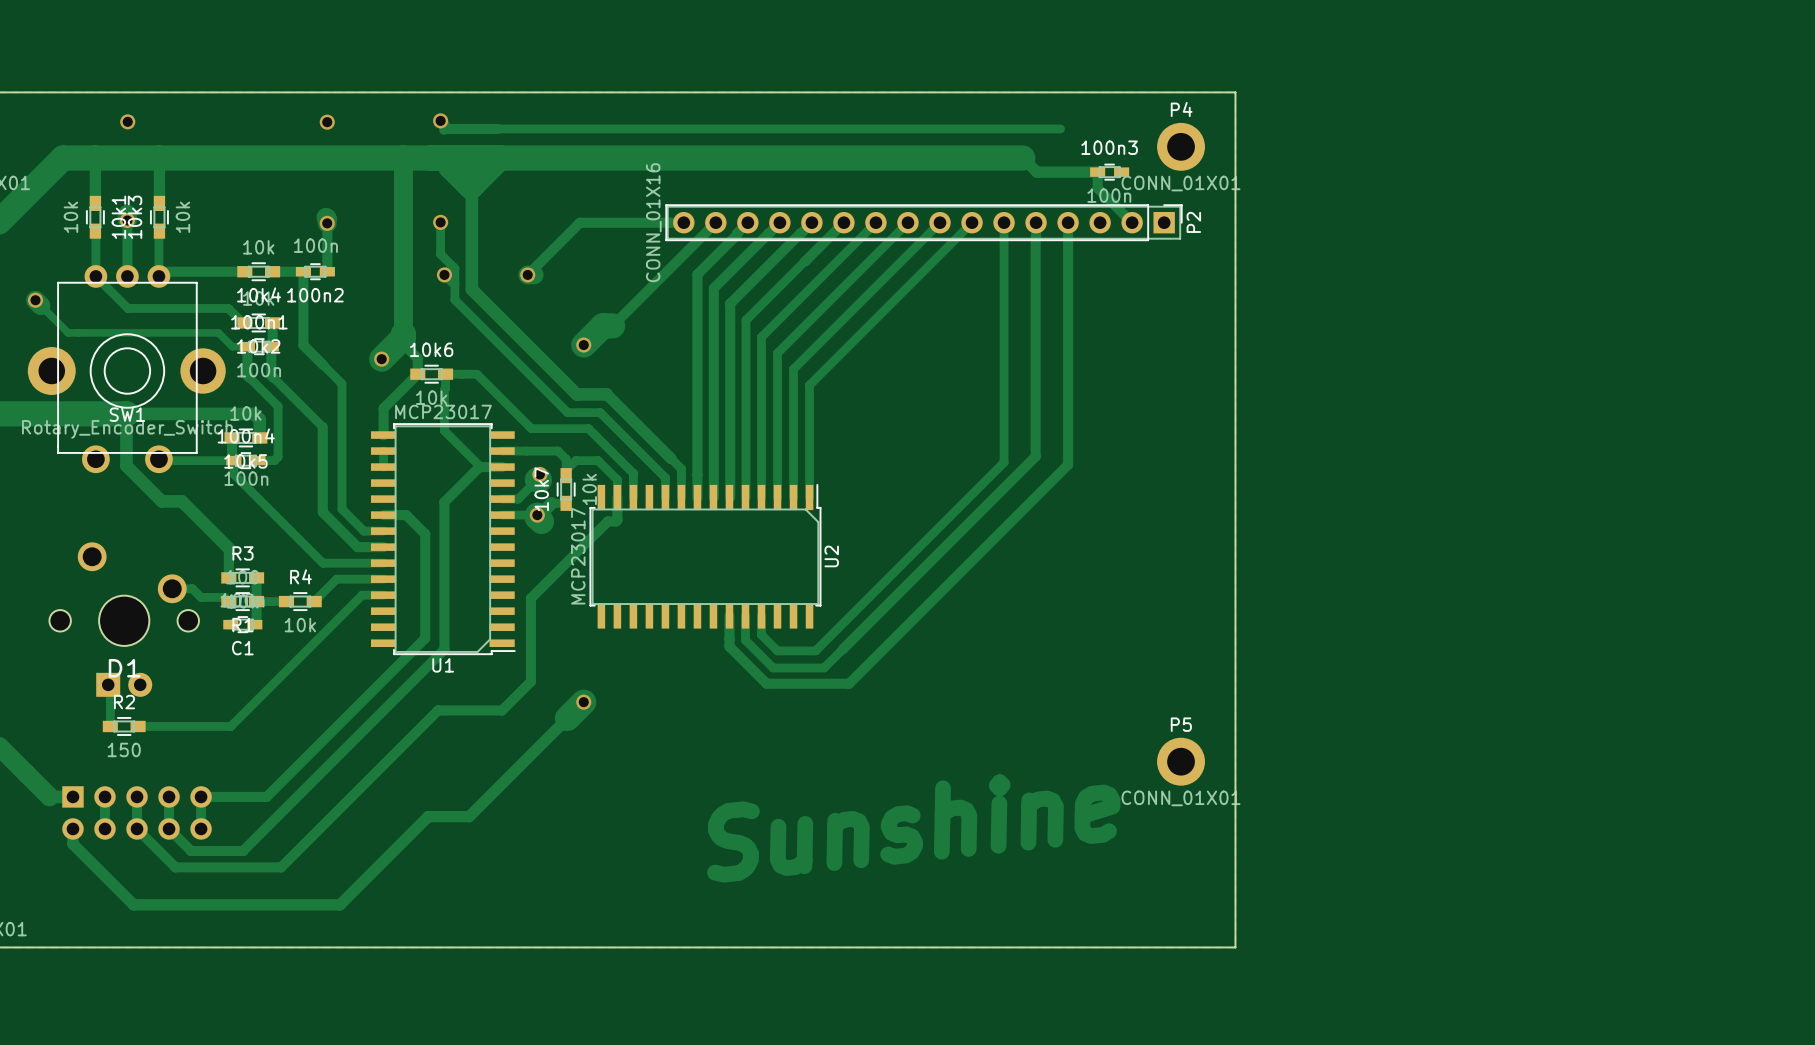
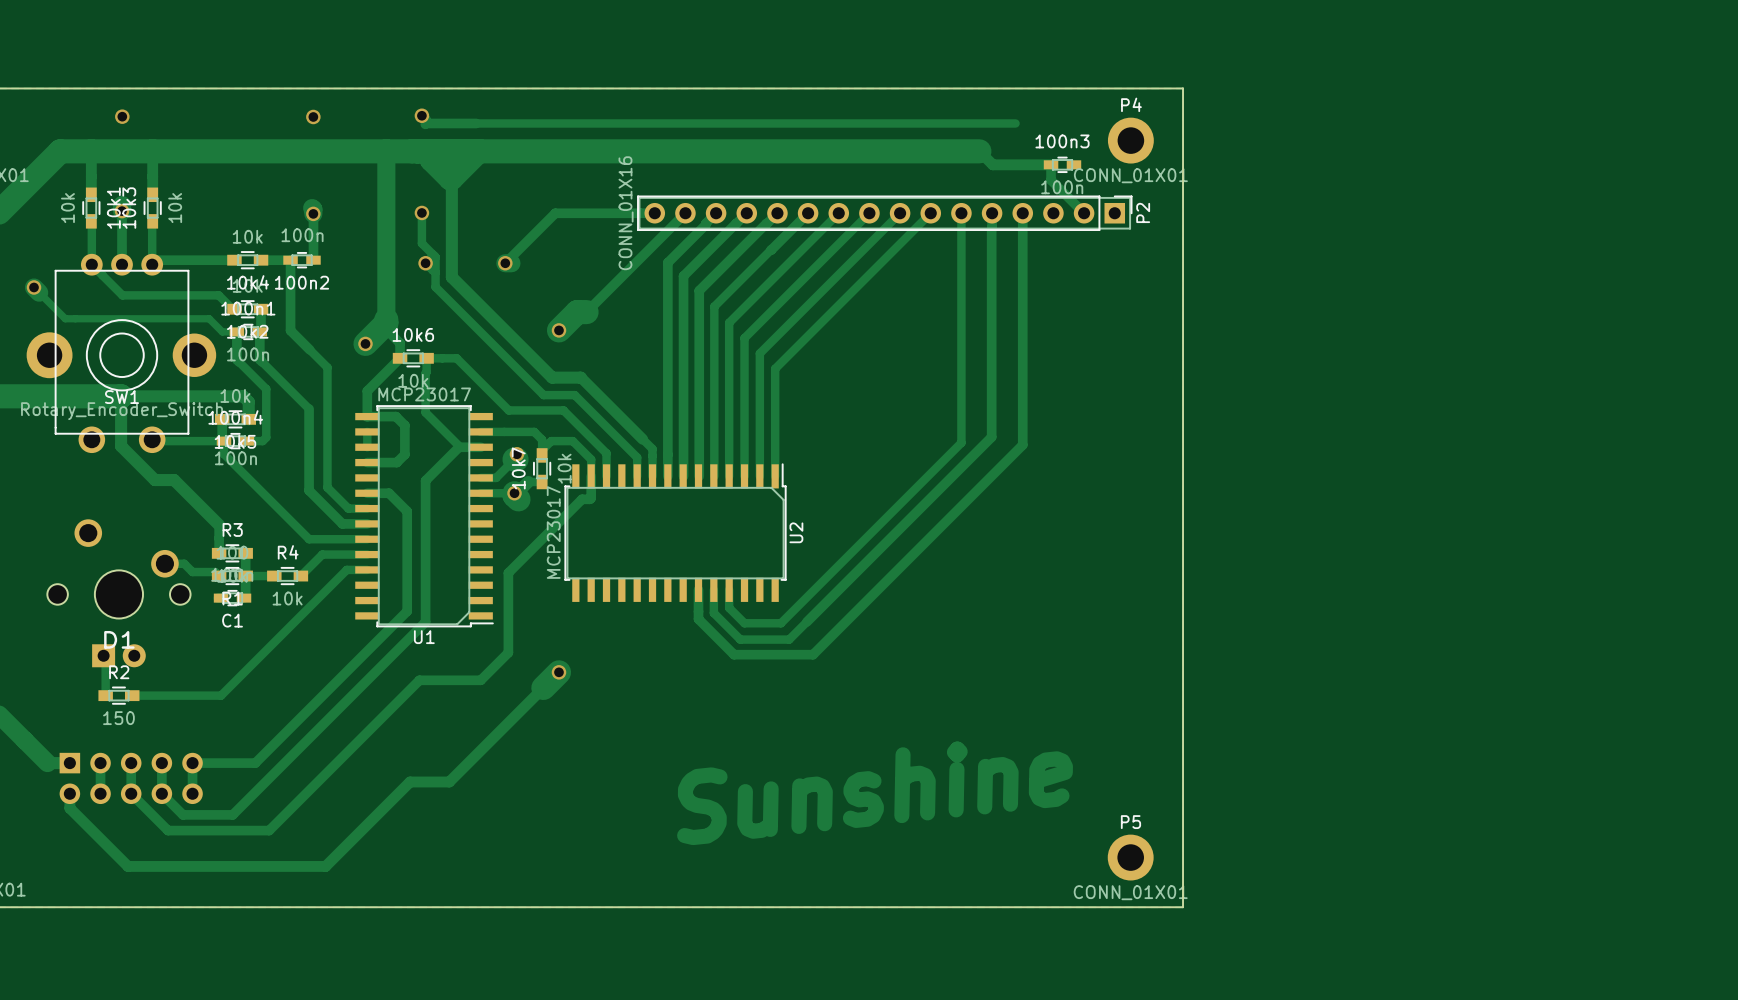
track: none -> (367, 416) (395, 416) (404, 425) (404, 454) (396, 462) (367, 462)
P5 position: (1181, 761) -> (1130, 857)

